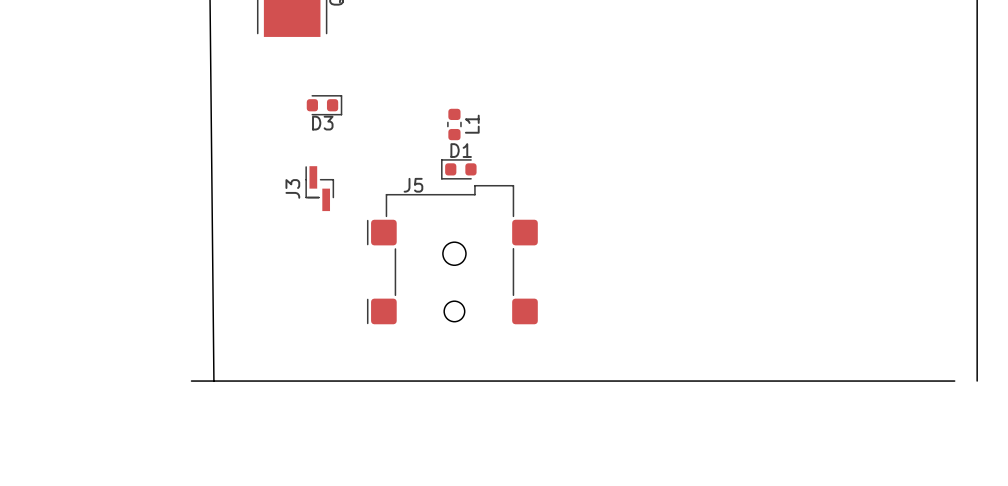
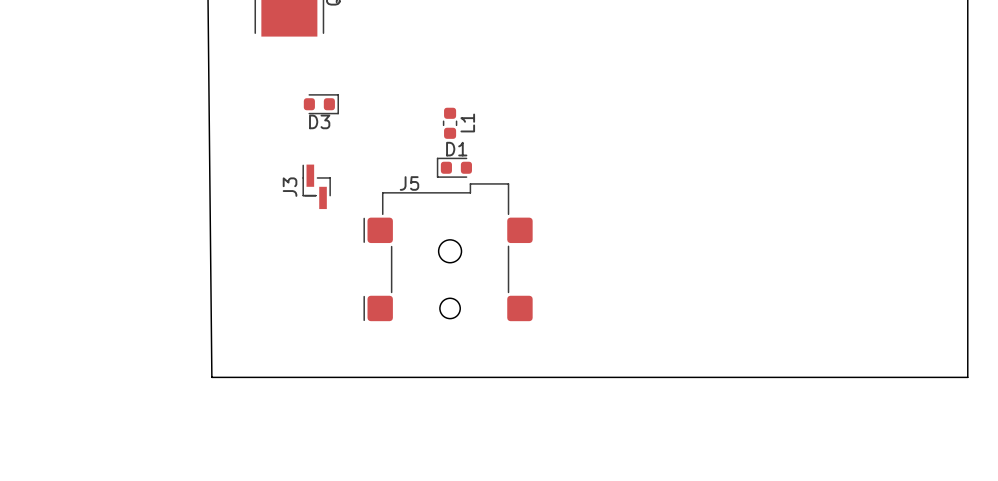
board edge: (191, 381) (213, 381) -> none
board edge: none -> (945, 377) (967, 377)

